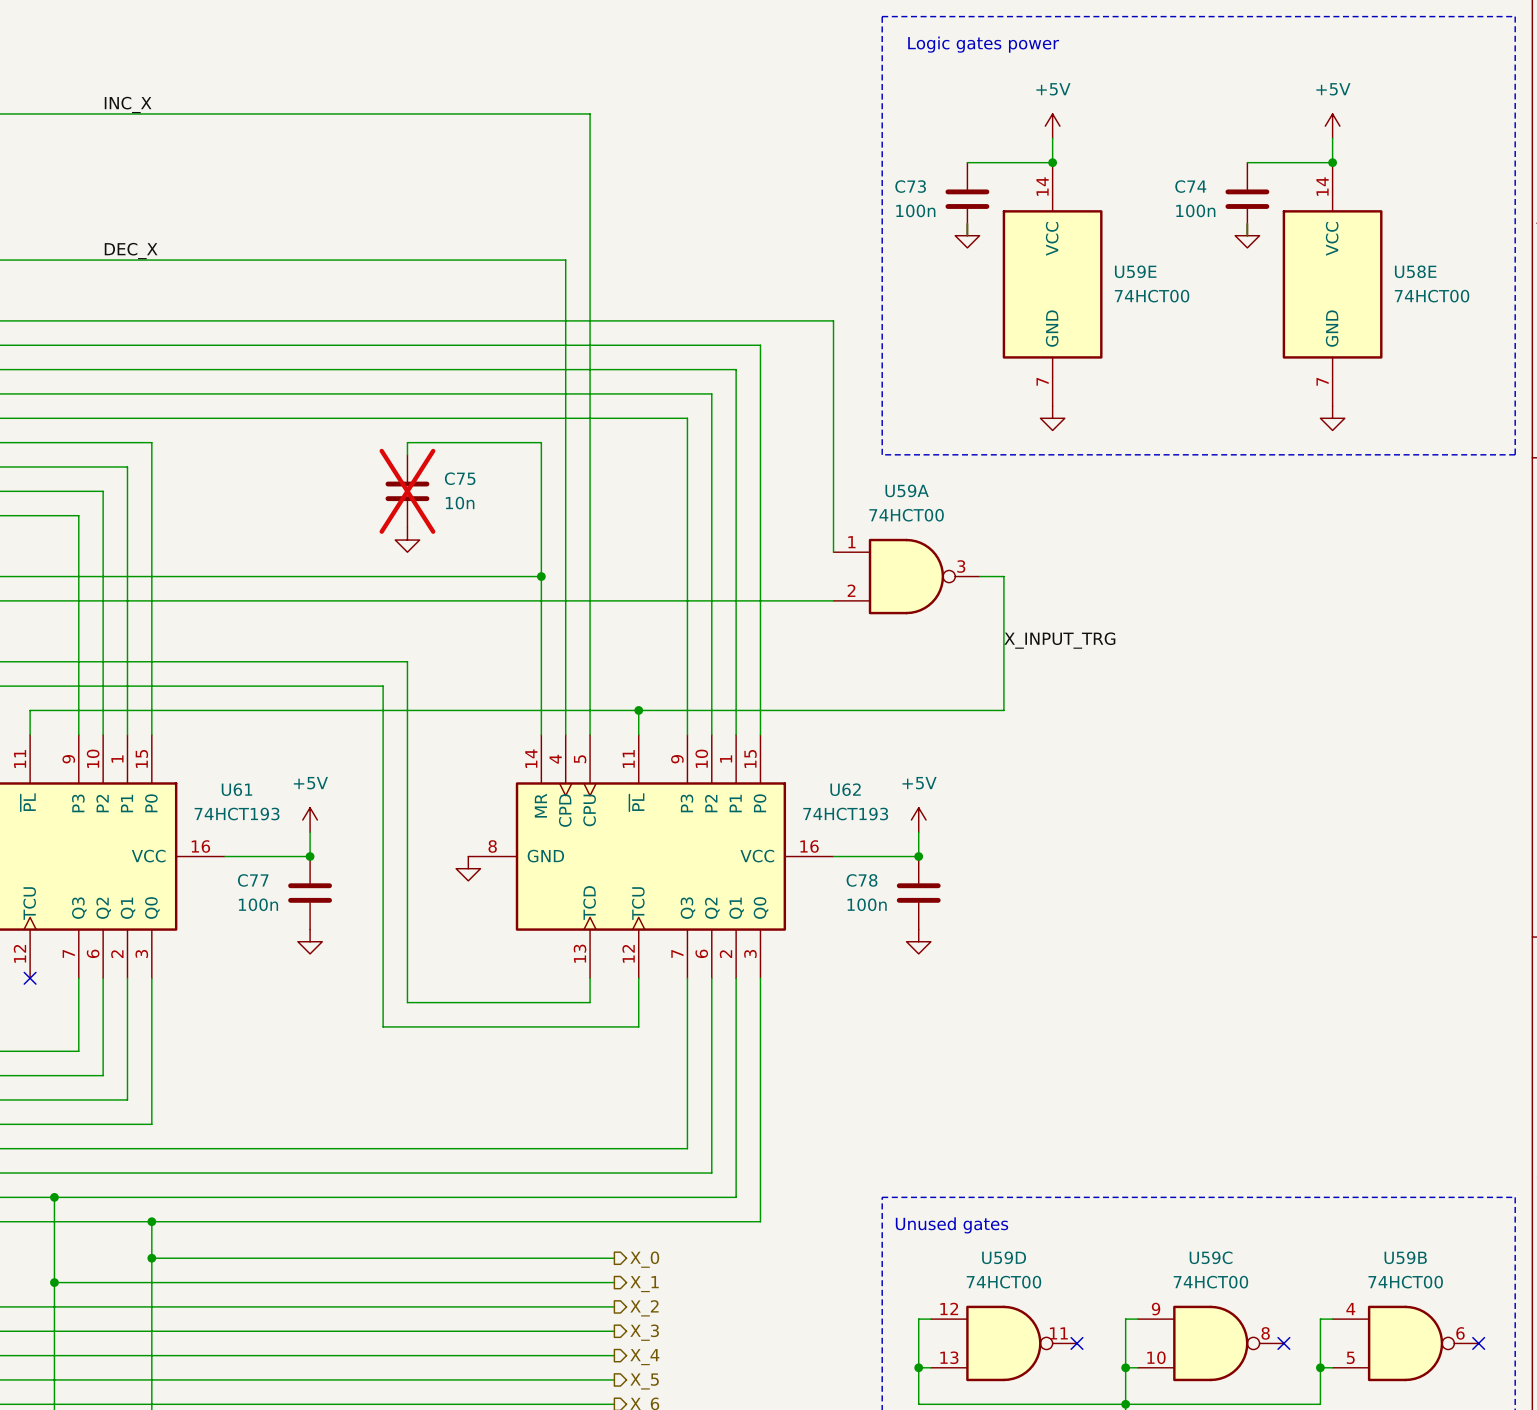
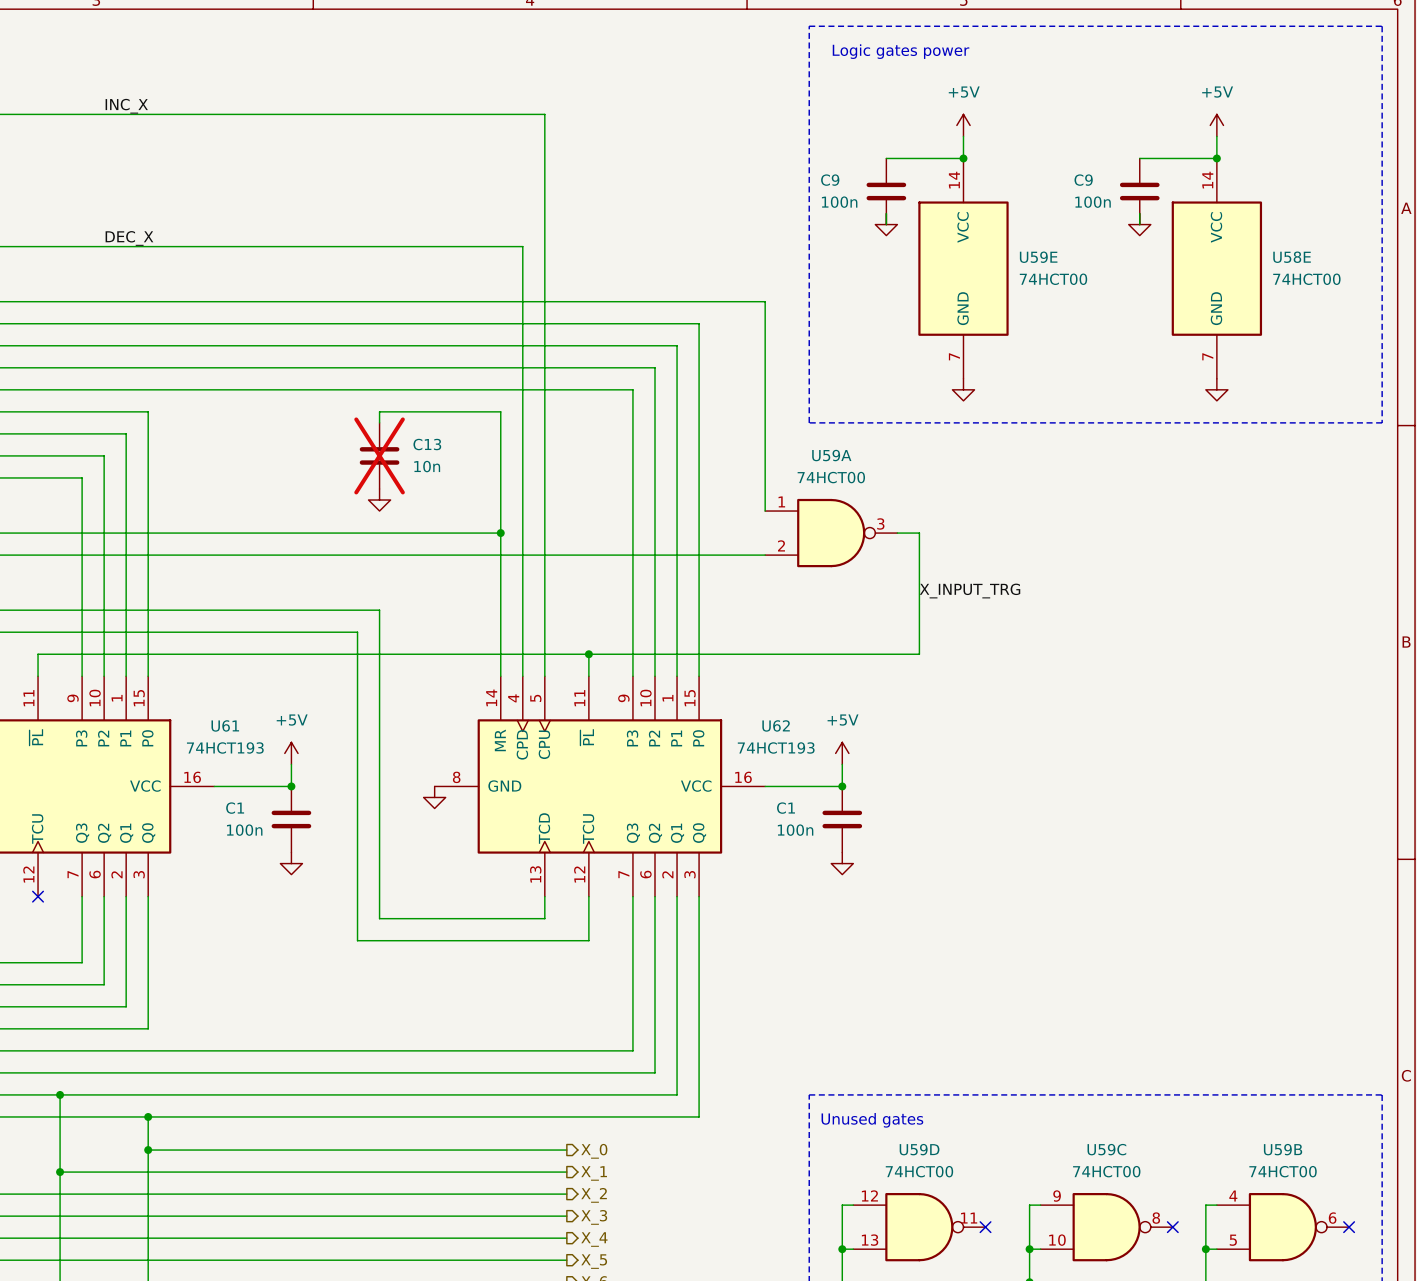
C73 name: C73 (910, 186) -> C9 (830, 180)
C74 name: C74 (1190, 186) -> C9 (1083, 180)
C75 name: C75 (460, 478) -> C13 (427, 444)
C77 name: C77 (253, 880) -> C1 (235, 808)
C78 name: C78 (862, 880) -> C1 (785, 808)

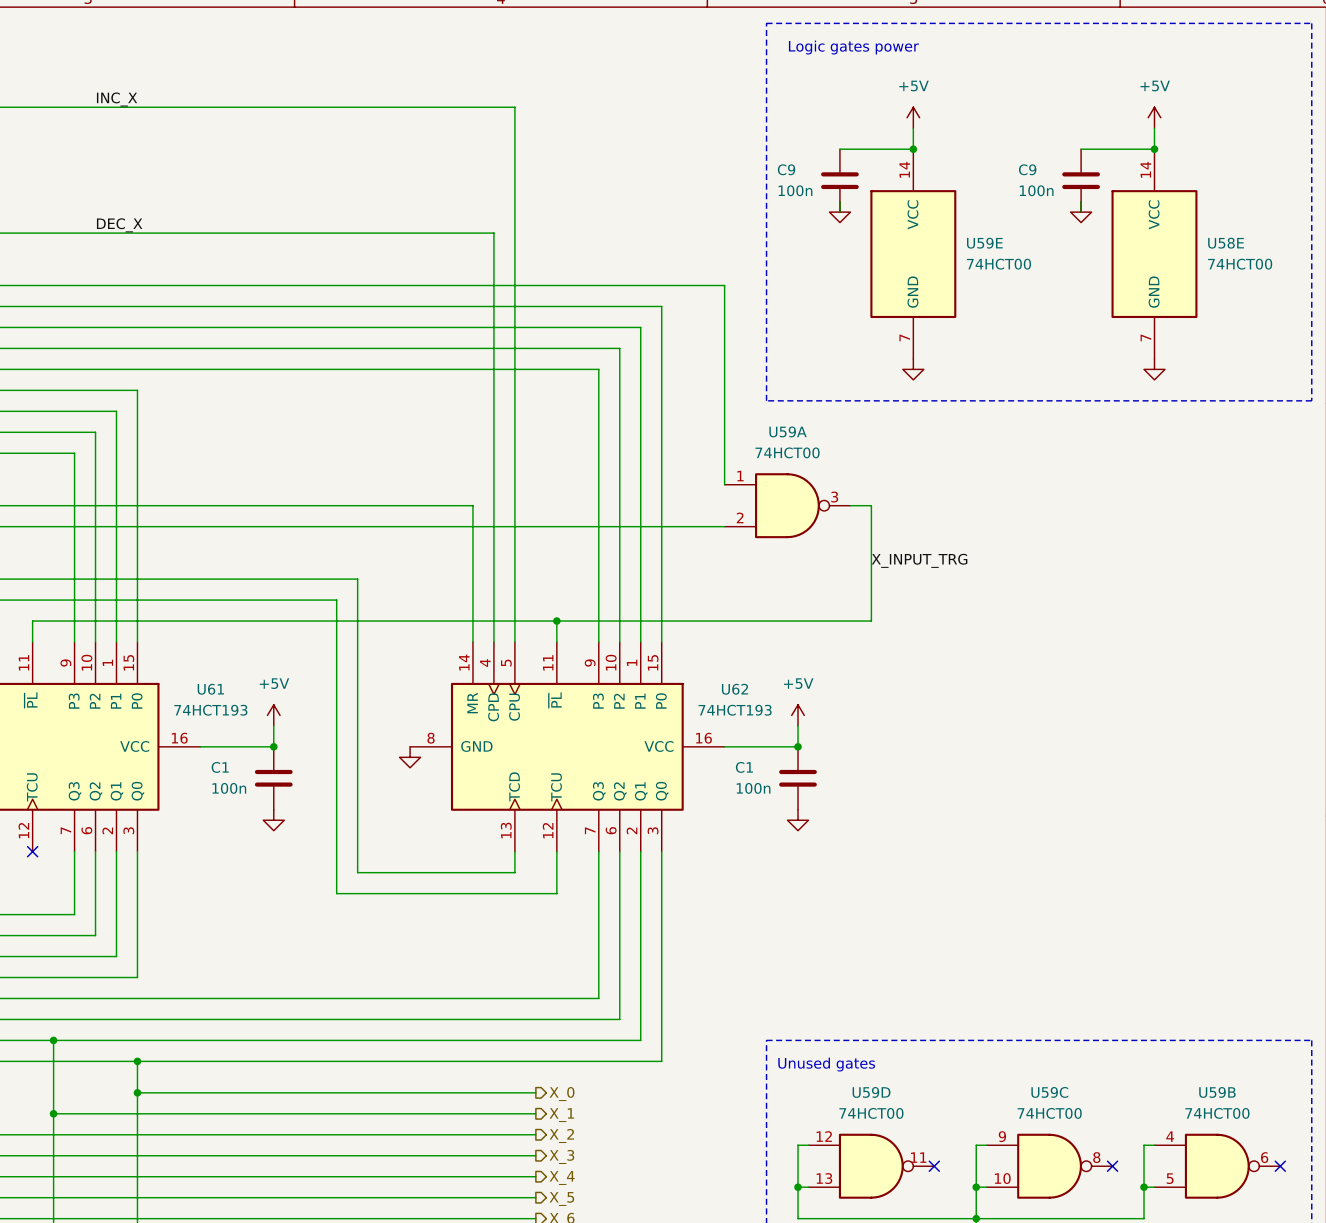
wire: (379, 422) (379, 411) (500, 411) (500, 533) -> none
C13: 10n (379, 455) -> none
power symbol: (379, 500) -> none
junction: (500, 533) -> none

